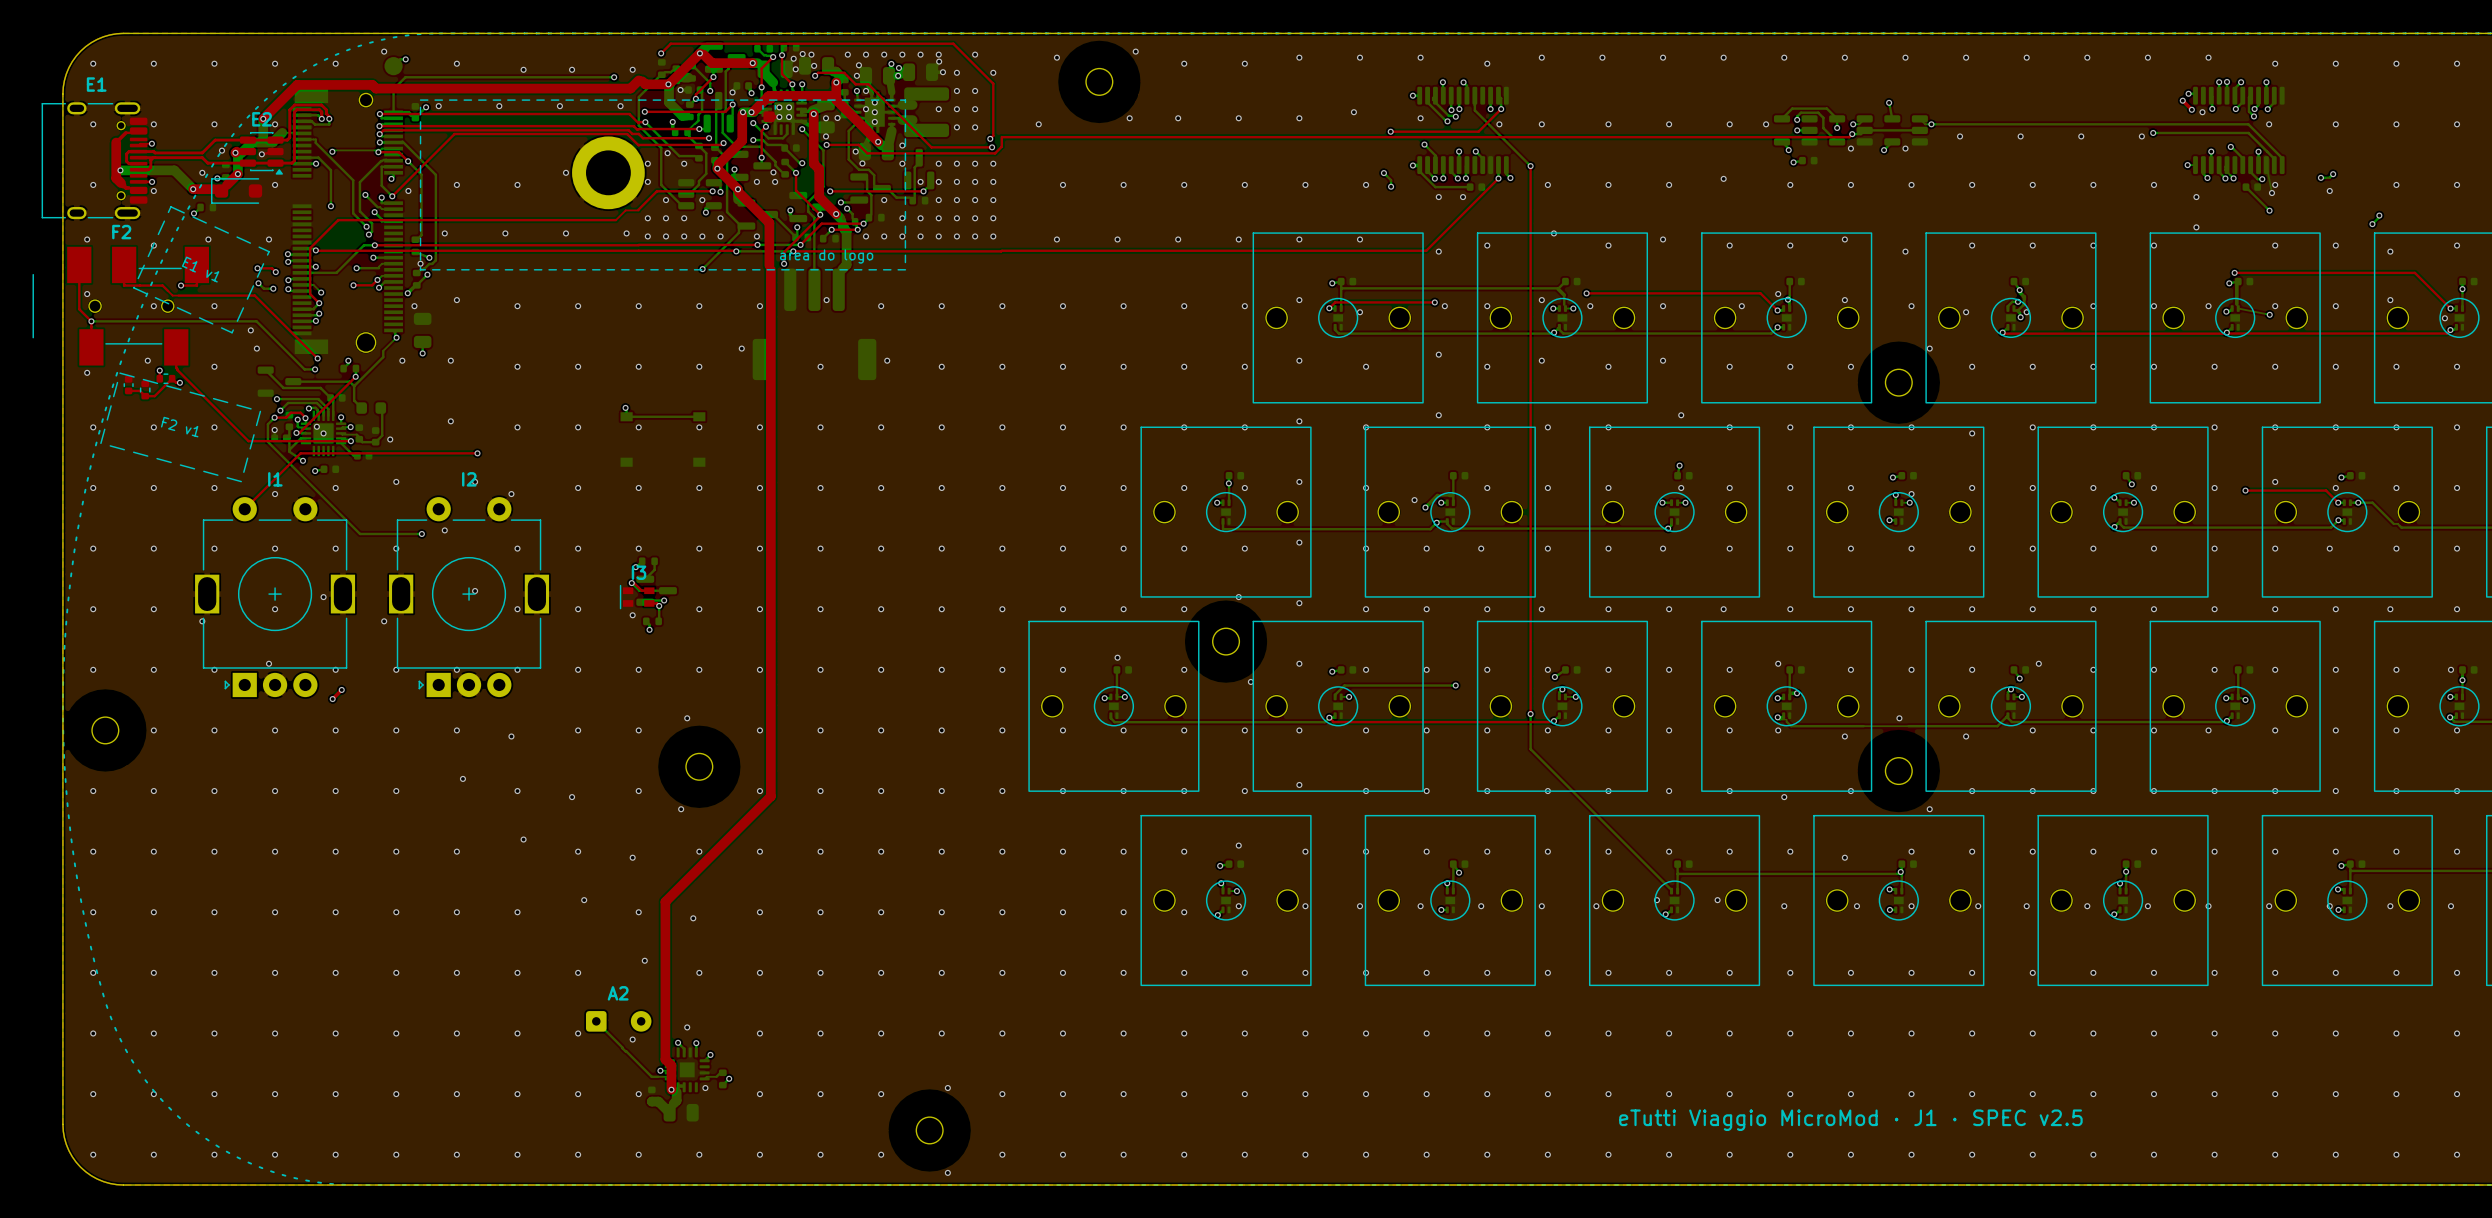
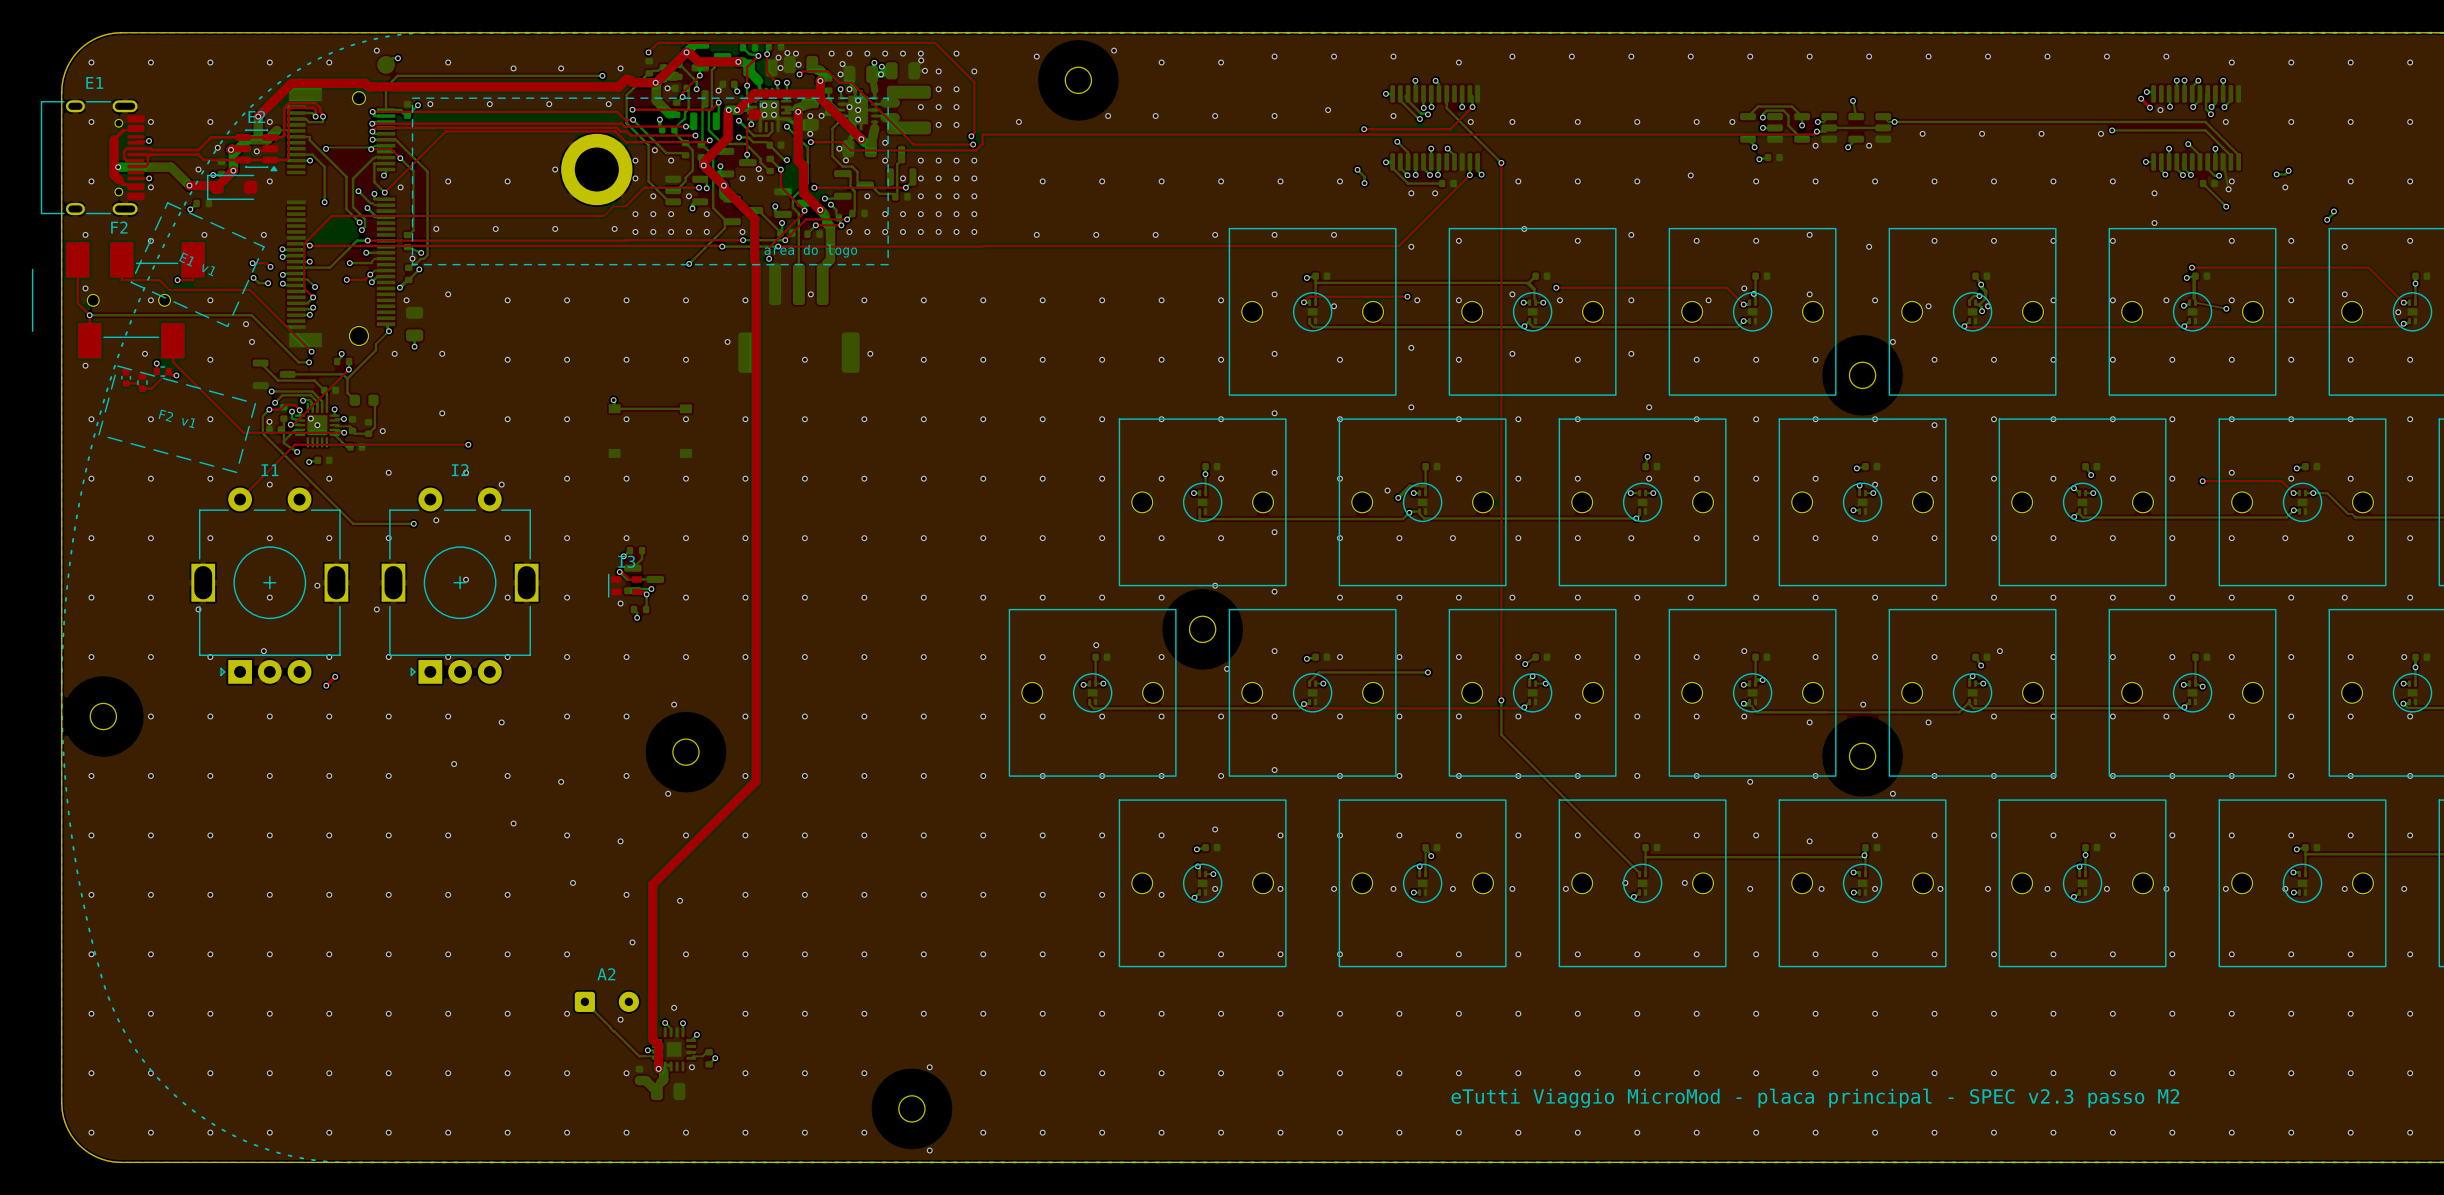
text: eTutti Viaggio MicroMod · J1 · SPEC v2.5 (1850, 1120) -> eTutti Viaggio MicroMod - placa principal - SPEC v2.3 passo M2 (1815, 1098)

